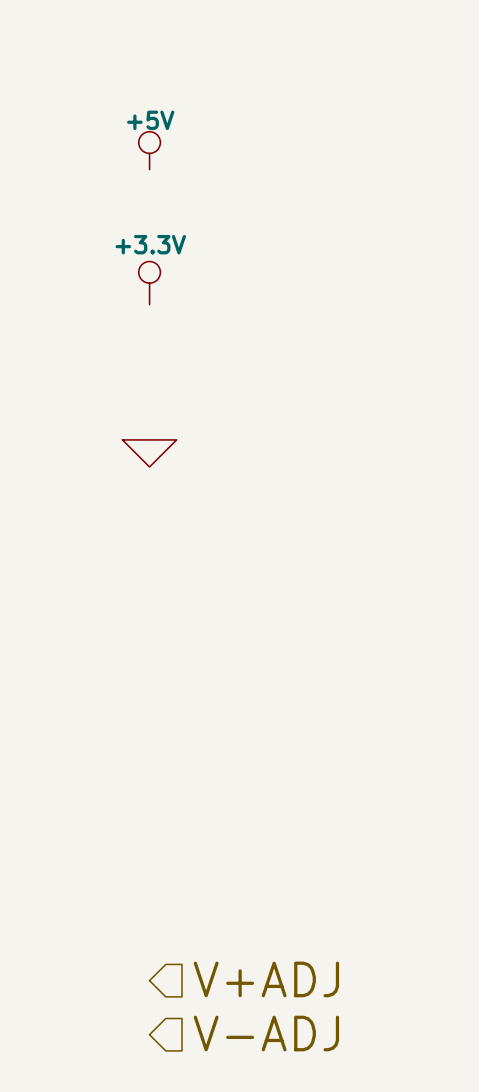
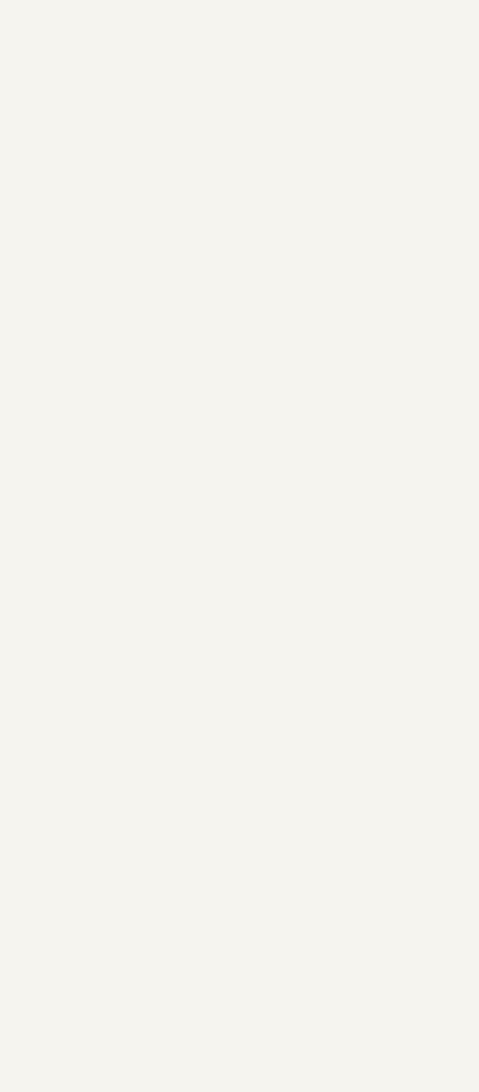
power symbol: +5V (149, 150) -> none
power symbol: +3.3V (149, 283) -> none
power symbol: (149, 453) -> none
hierarchical label: V+ADJ (266, 979) -> none
hierarchical label: V-ADJ (266, 1033) -> none

